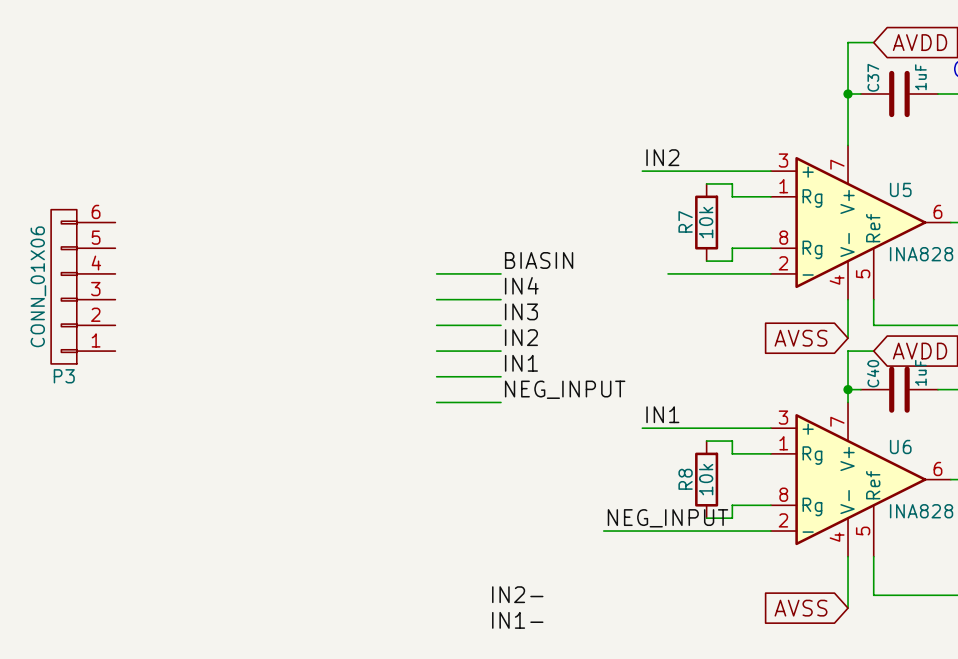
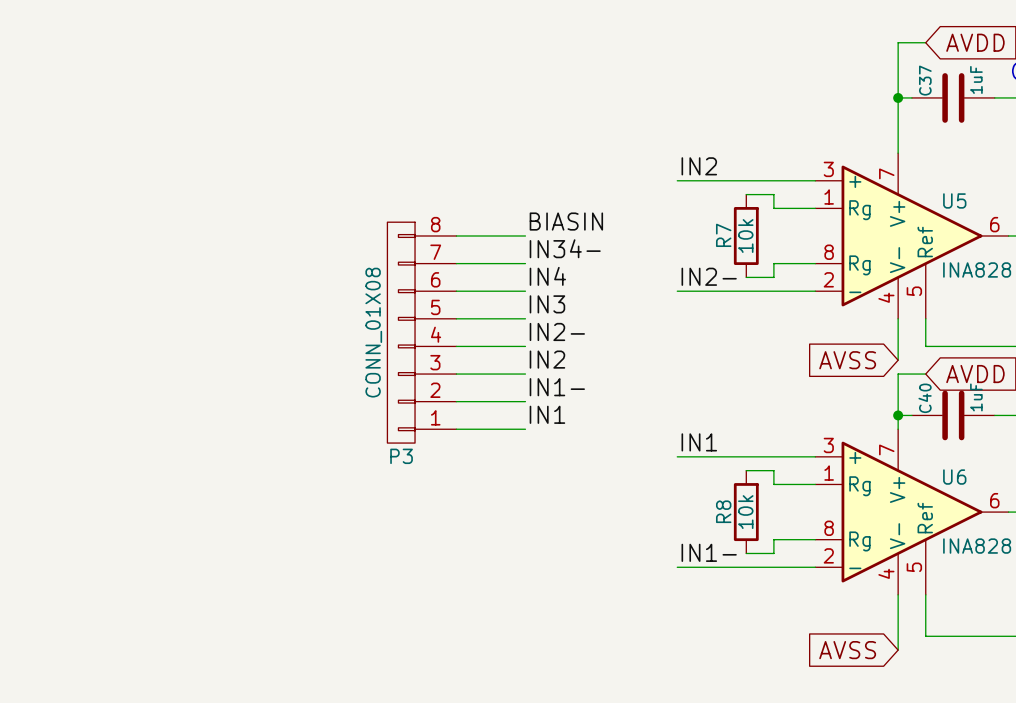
P3 symbol: [51, 209, 116, 364] -> [387, 222, 457, 444]
label: none -> BIASIN (566, 221)
wire: none -> (456, 235) (525, 235)
label: none -> IN34- (565, 248)
wire: none -> (456, 263) (525, 263)
label: BIASIN (539, 260) -> IN4 (547, 276)
label: none -> IN2- (709, 276)
wire: none -> (677, 291) (704, 291)
label: IN4 (521, 285) -> IN3 (547, 304)
P3 value: CONN_01X06 (38, 286) -> CONN_01X08 (373, 332)
label: IN3 (521, 311) -> IN2- (557, 331)
label: IN1 (521, 363) -> IN1- (557, 387)
P3 name position: P3 (64, 376) -> P3 (401, 456)
label: NEG_INPUT (565, 389) -> IN1 (547, 414)
label: NEG_INPUT (667, 518) -> none
wire: (603, 531) (642, 531) -> none
label: IN2- (517, 594) -> none
label position: IN1- (517, 620) -> IN1- (709, 552)

